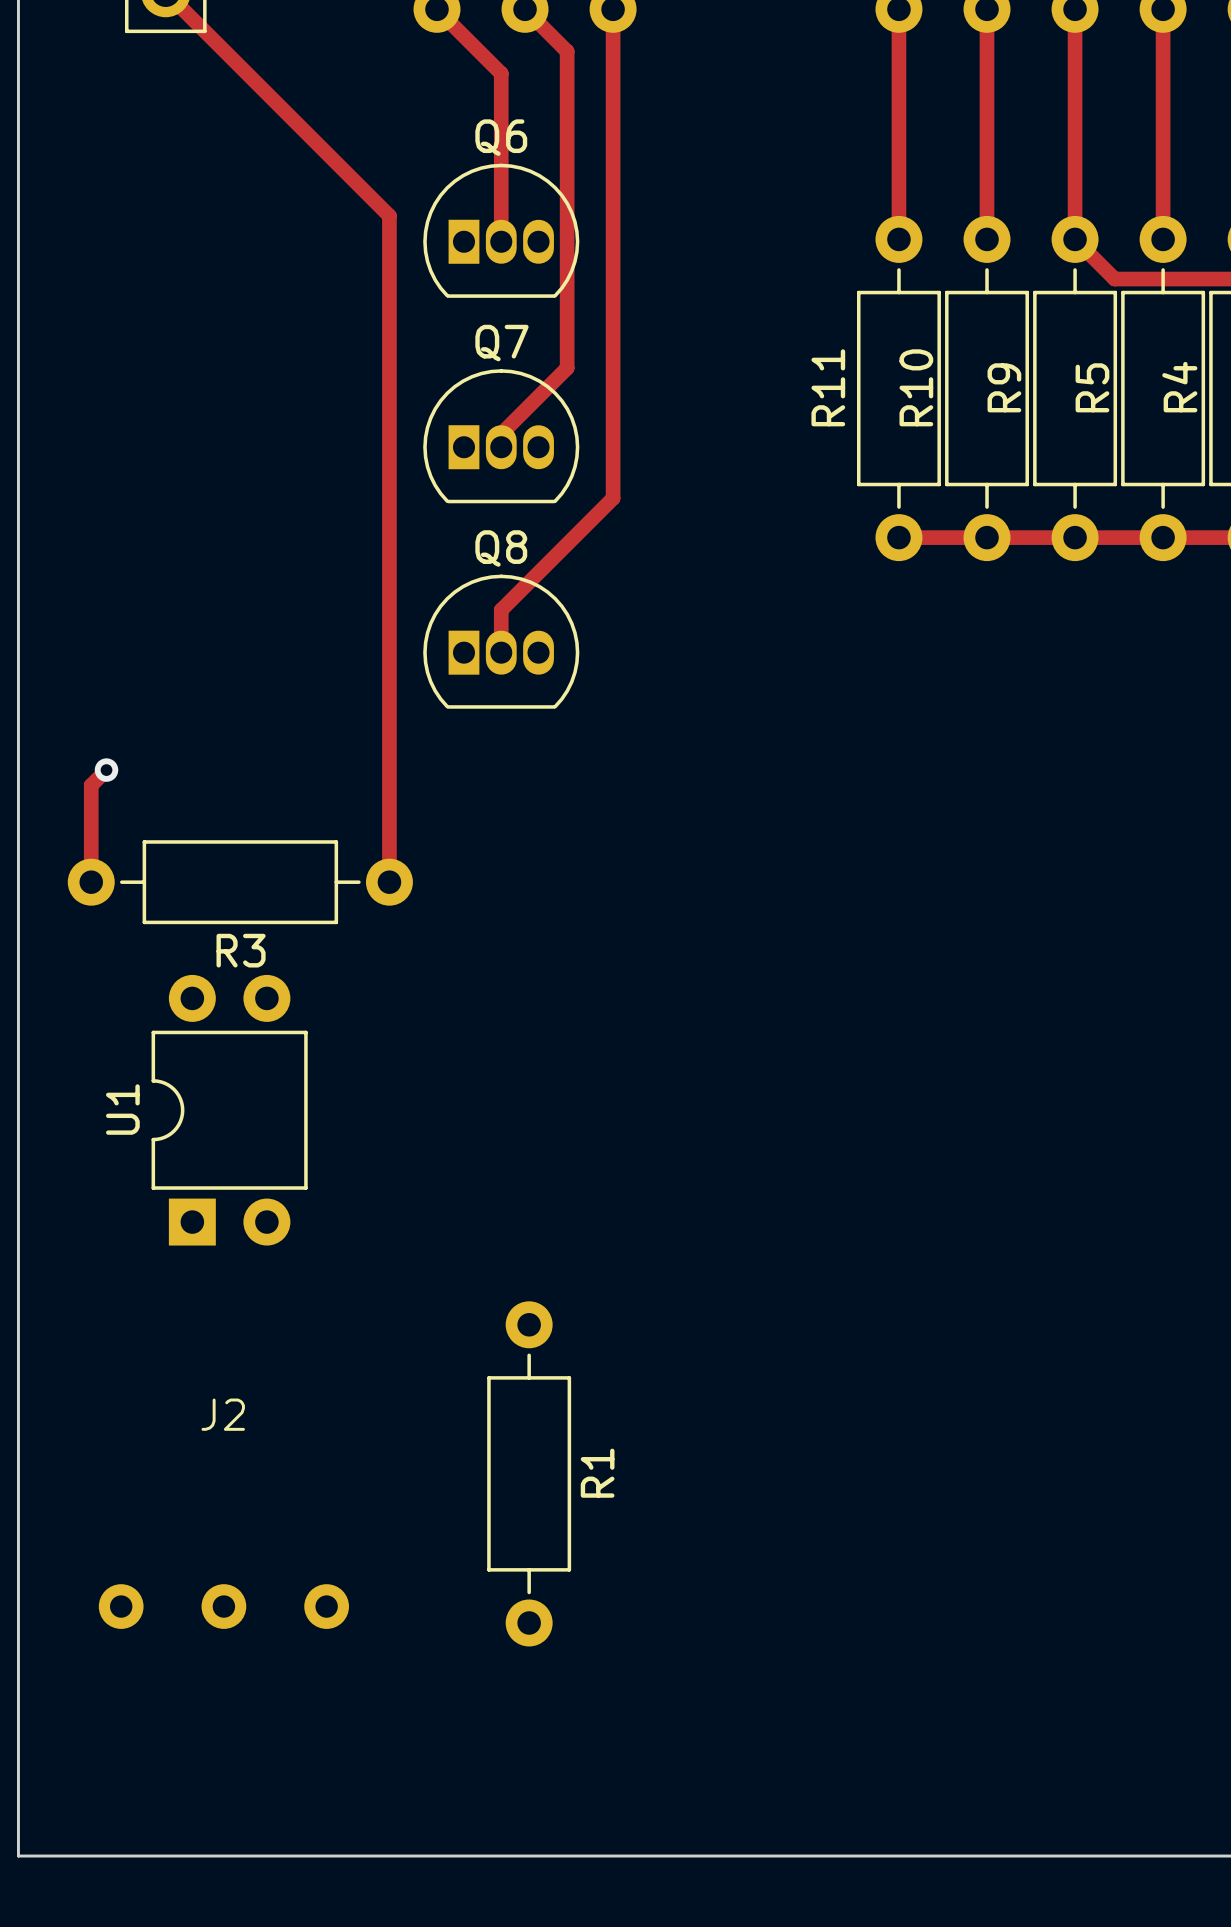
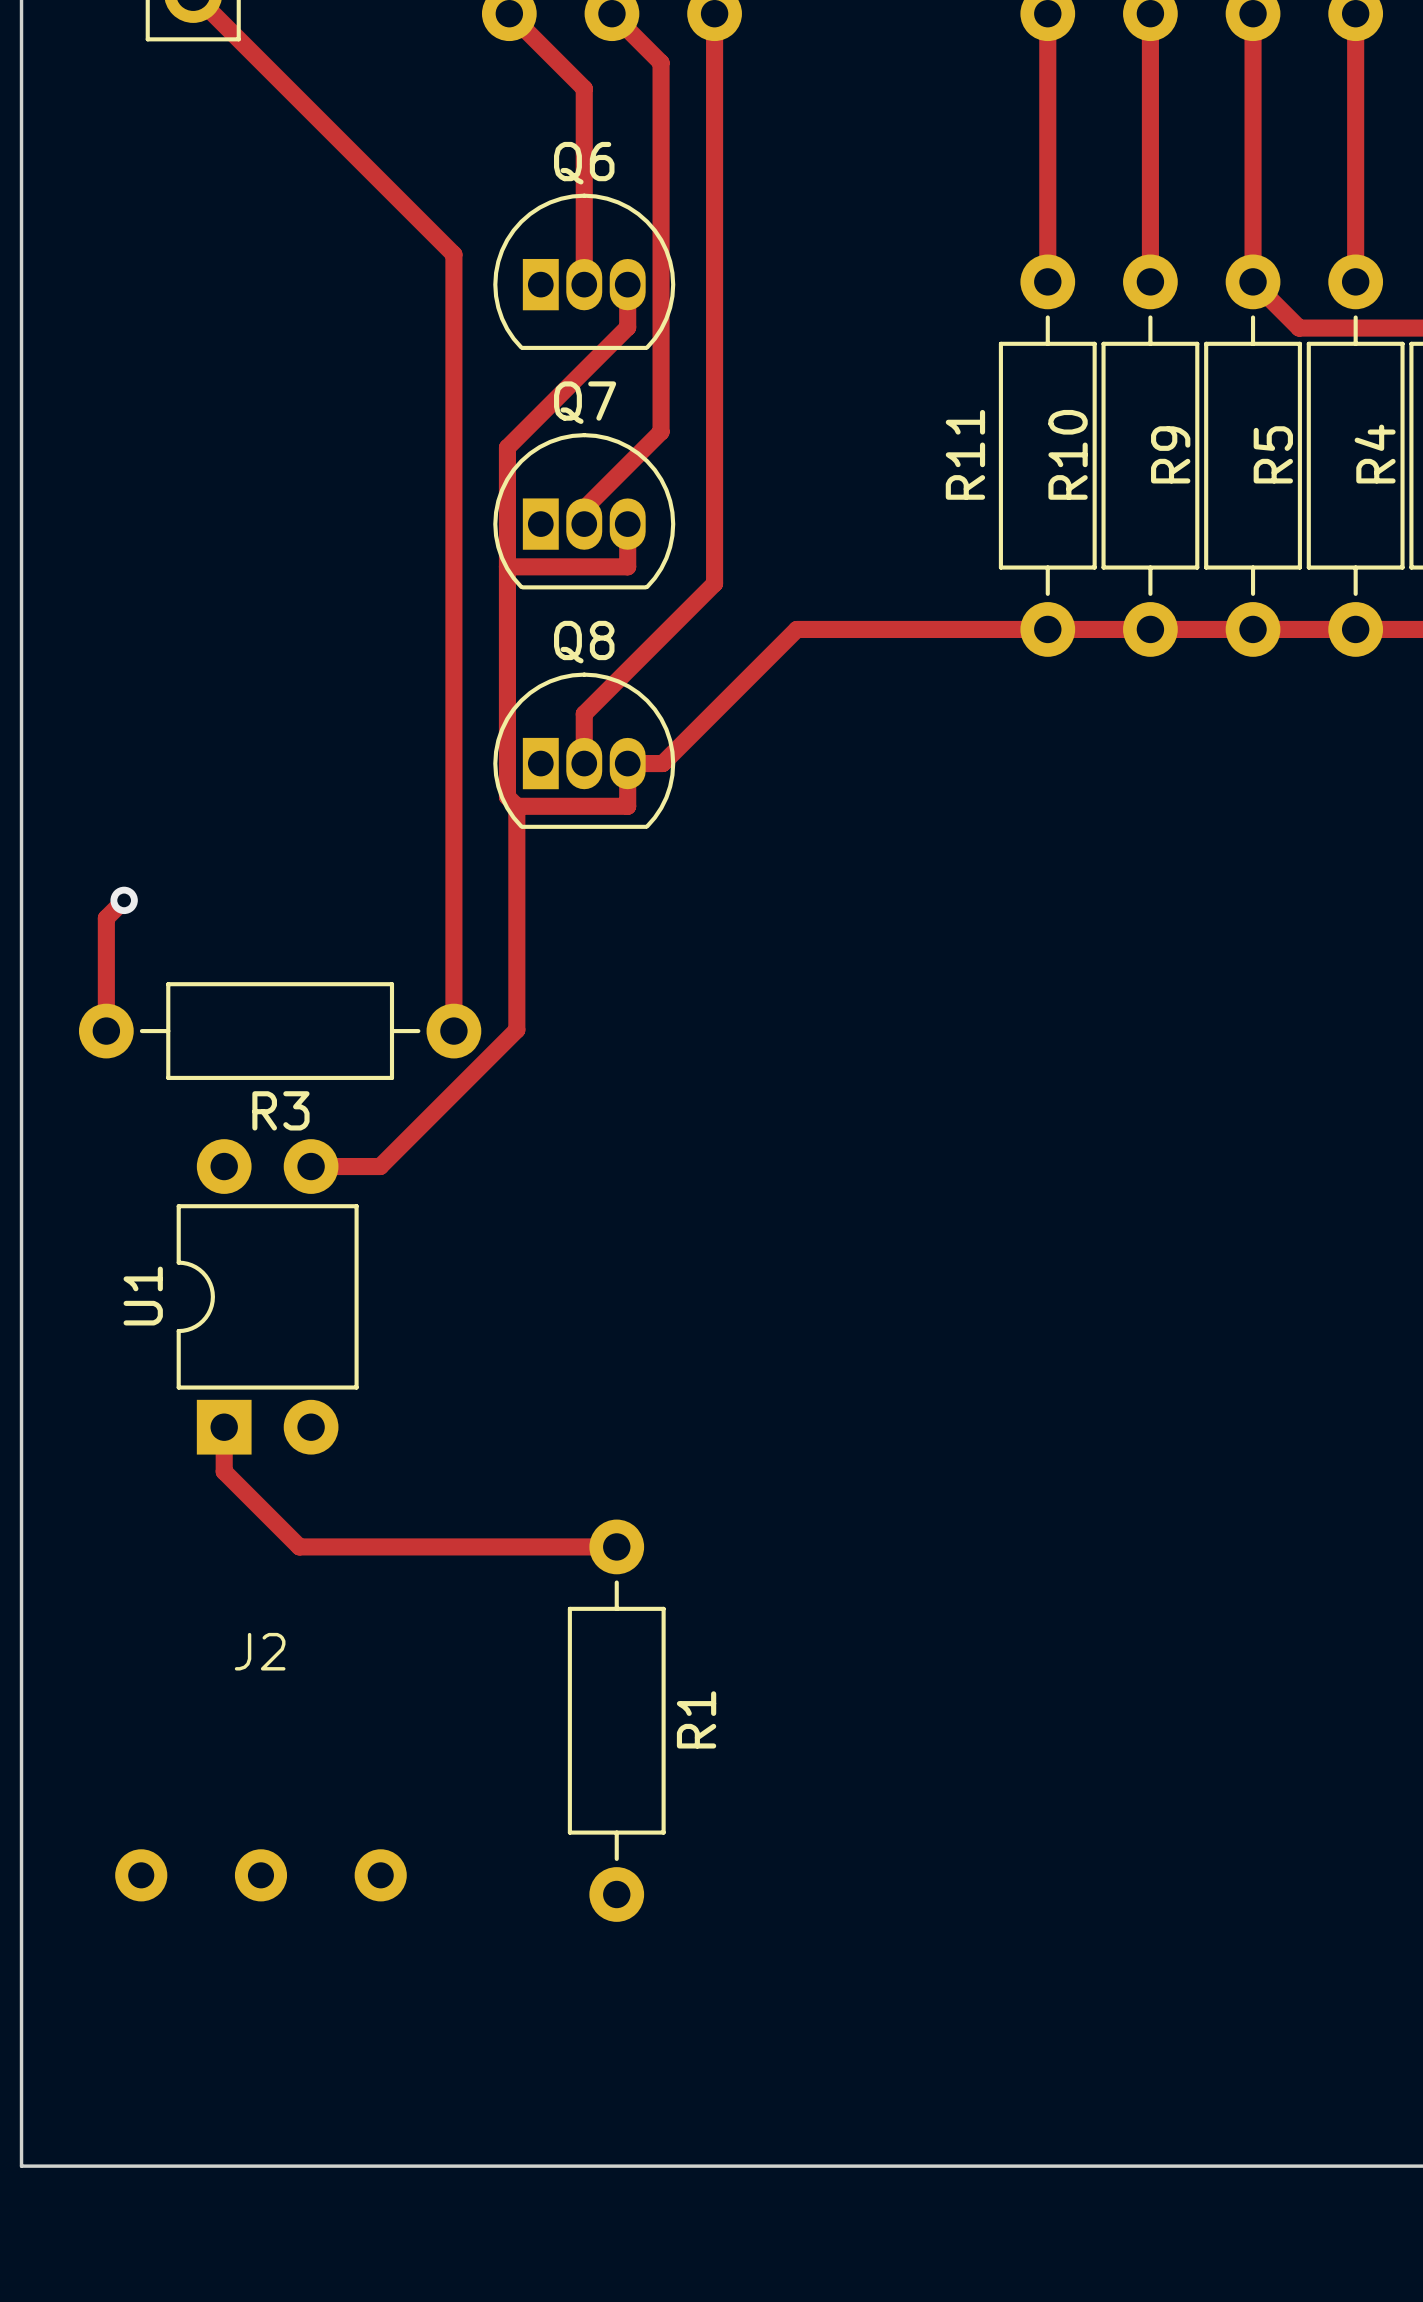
track: none -> (627, 284) (627, 327) (507, 447) (507, 796) (516, 806)
track: none -> (627, 524) (627, 566) (507, 566)
track: none -> (1047, 629) (796, 629) (662, 763) (627, 763) (627, 806) (516, 806)
track: none -> (516, 806) (516, 1029) (380, 1166) (311, 1166)
track: none -> (224, 1427) (224, 1471) (299, 1546) (616, 1546)

